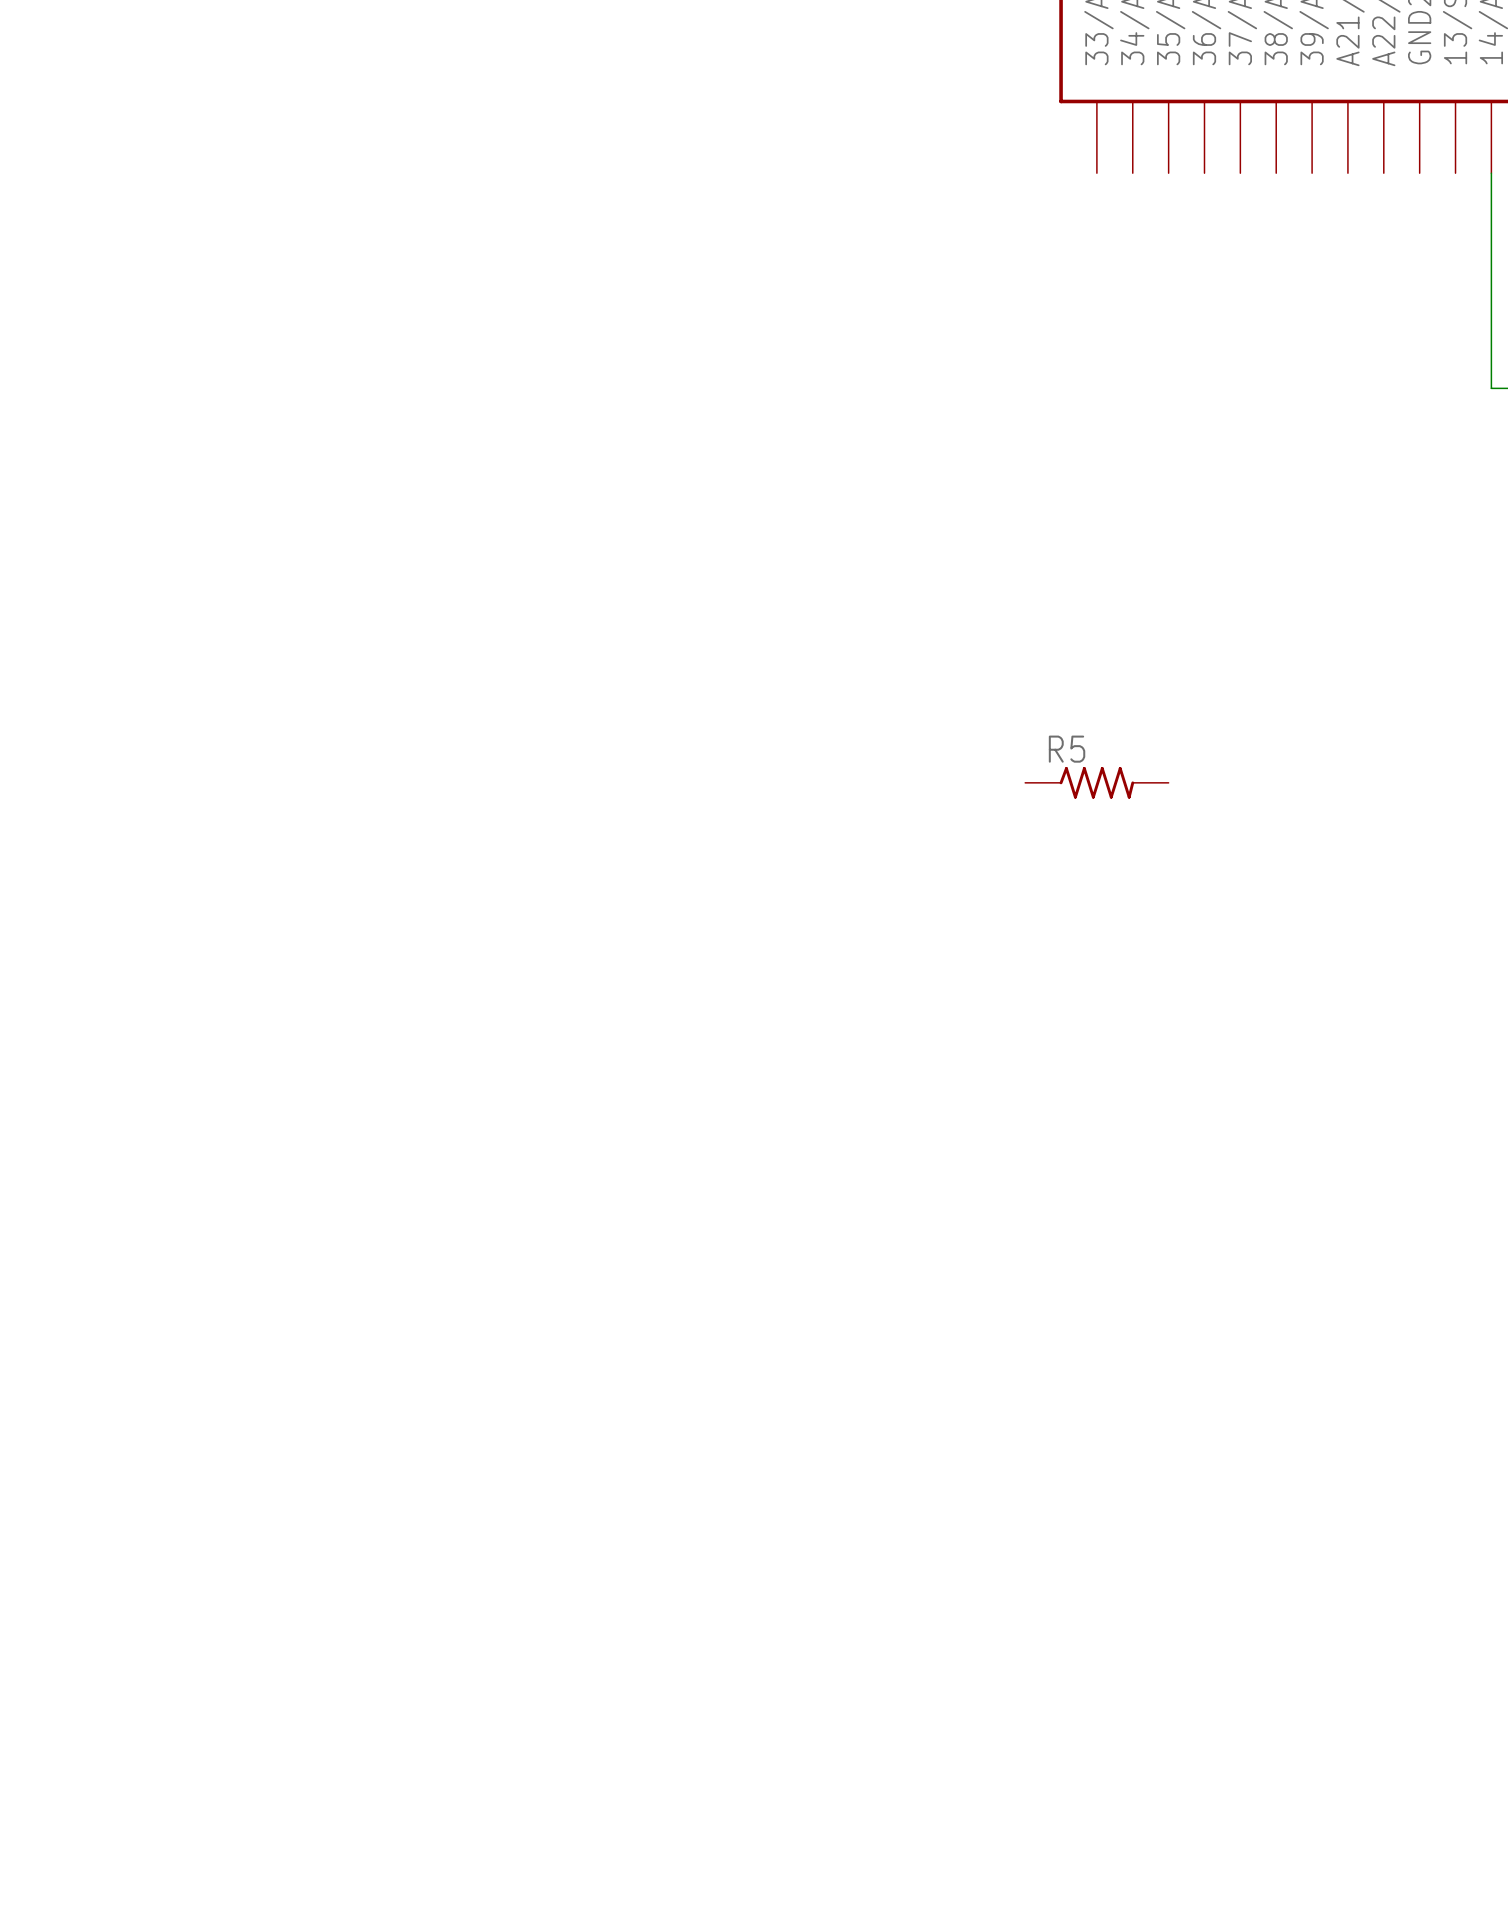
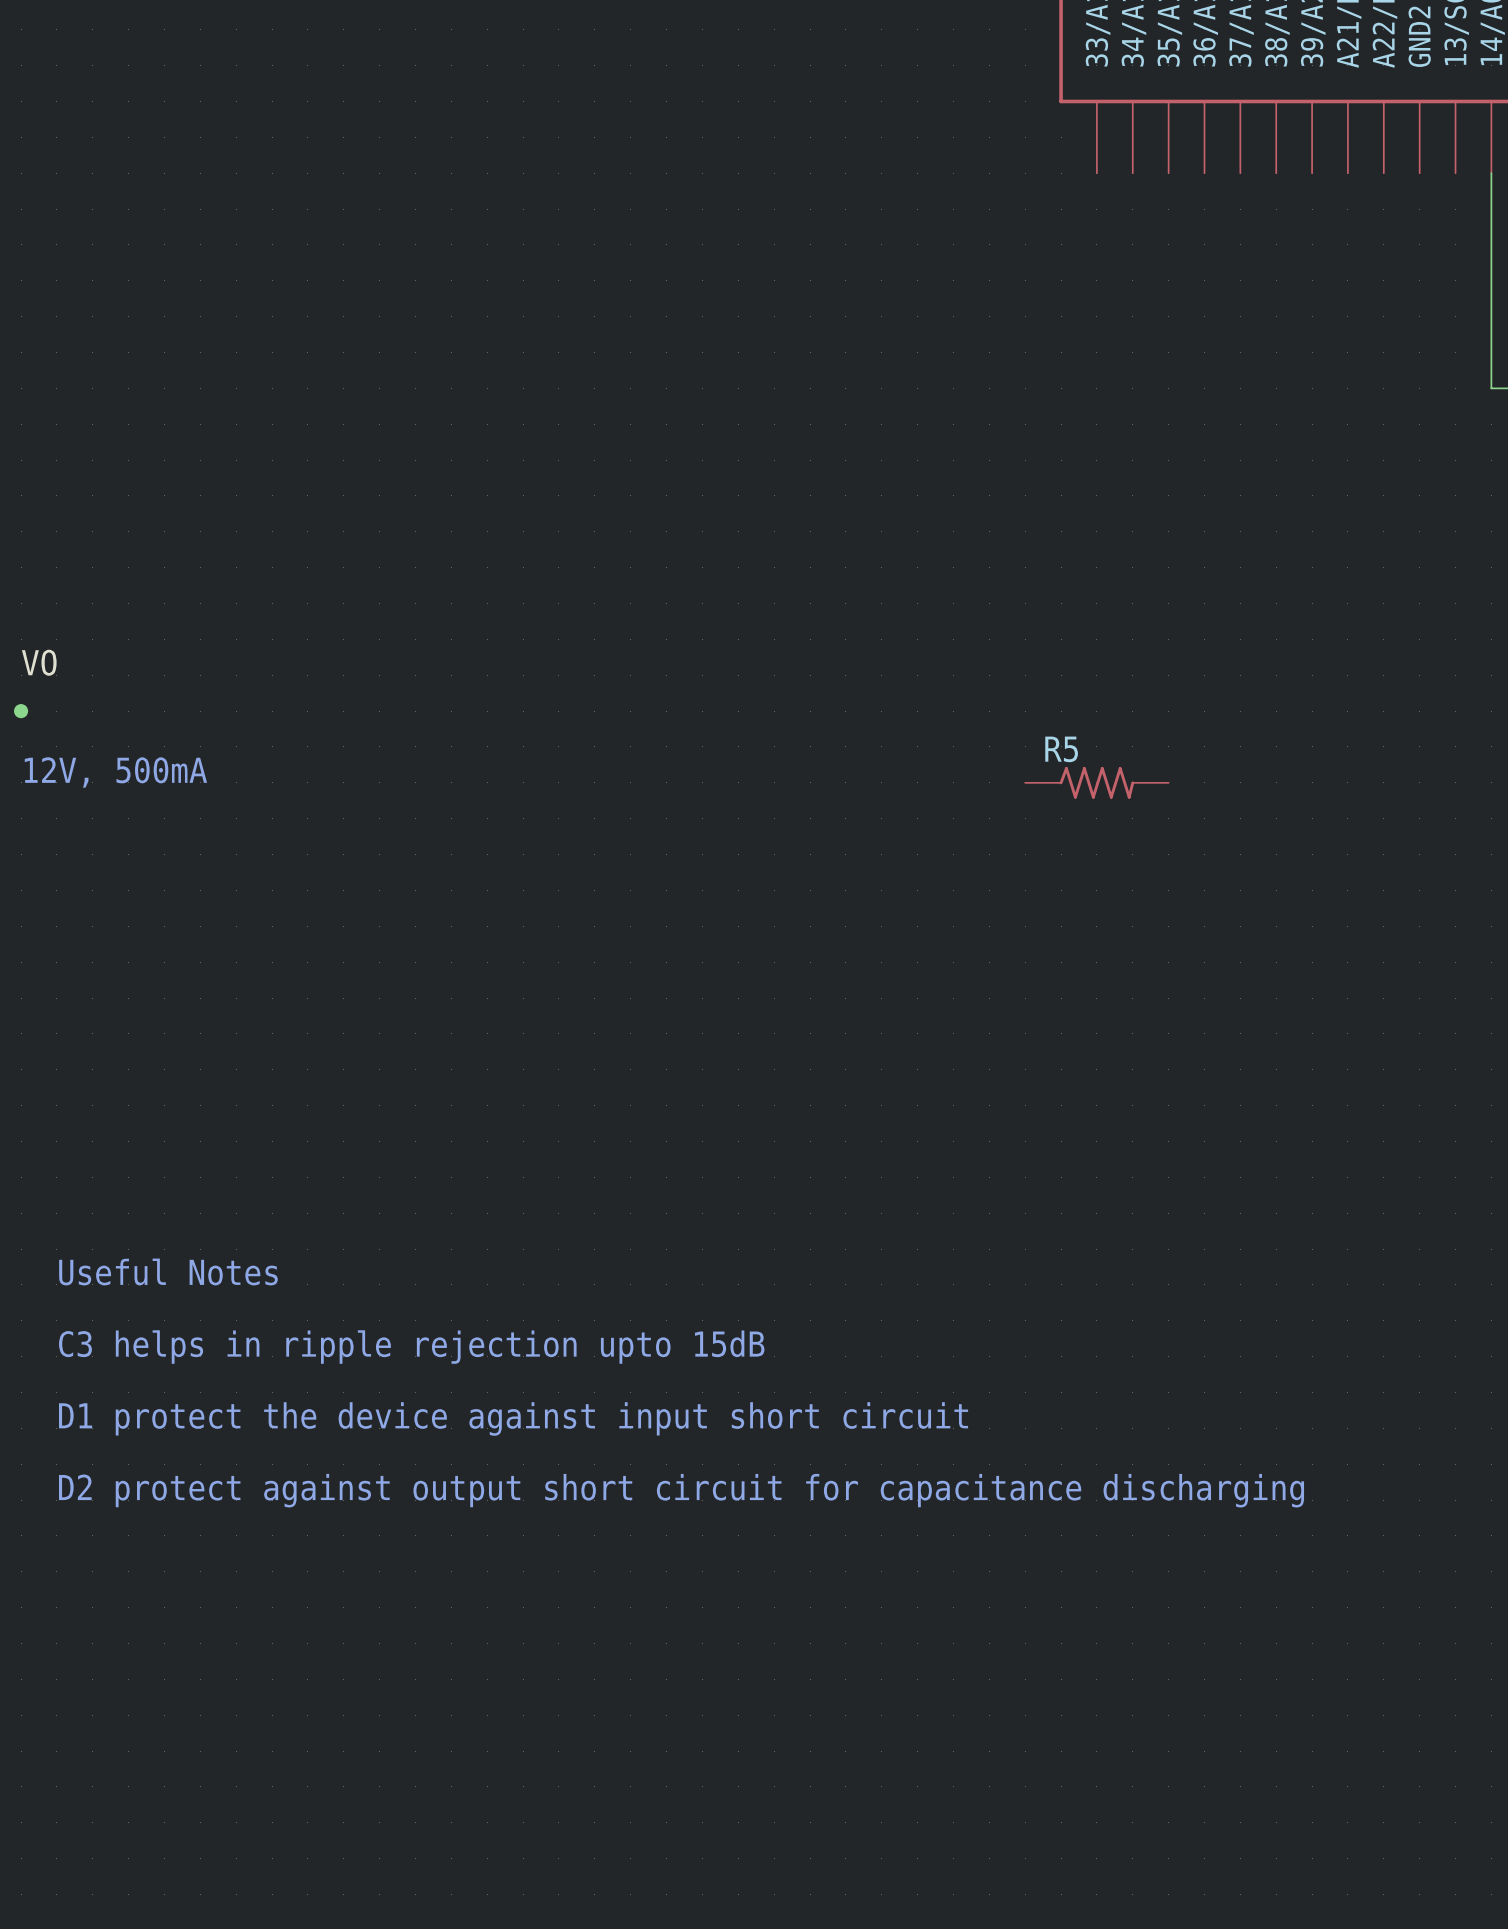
label: none -> VO (39, 662)
junction: none -> (21, 711)
text: none -> 12V, 500mA (115, 772)
text: none -> Useful Notes (168, 1271)
text: none -> C3 helps in ripple rejection upto 15dB (411, 1347)
text: none -> D1 protect the device against input short circuit (513, 1418)
text: none -> D2 protect against output short circuit for capacitance discharging (681, 1490)

